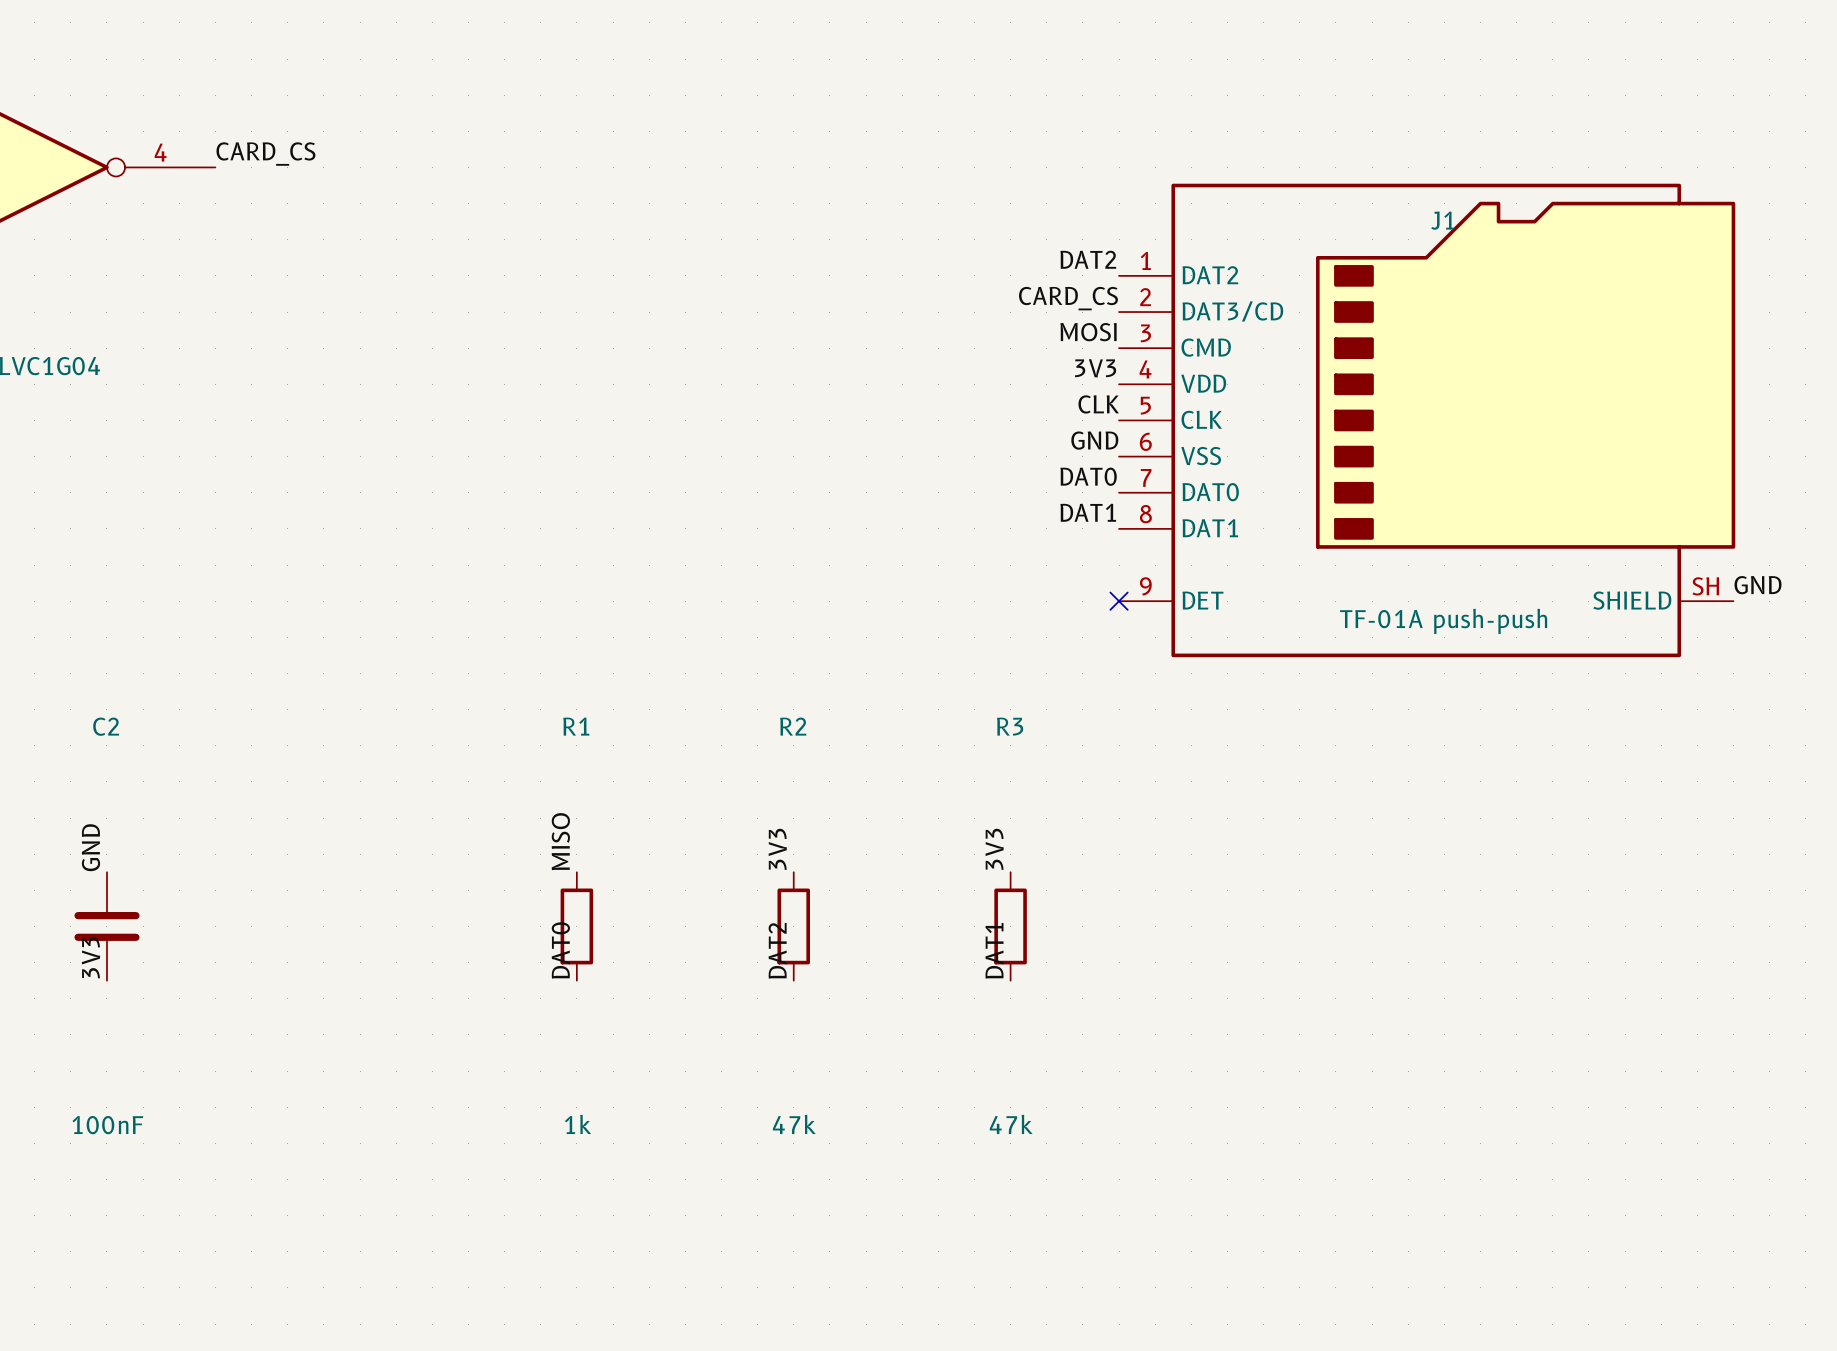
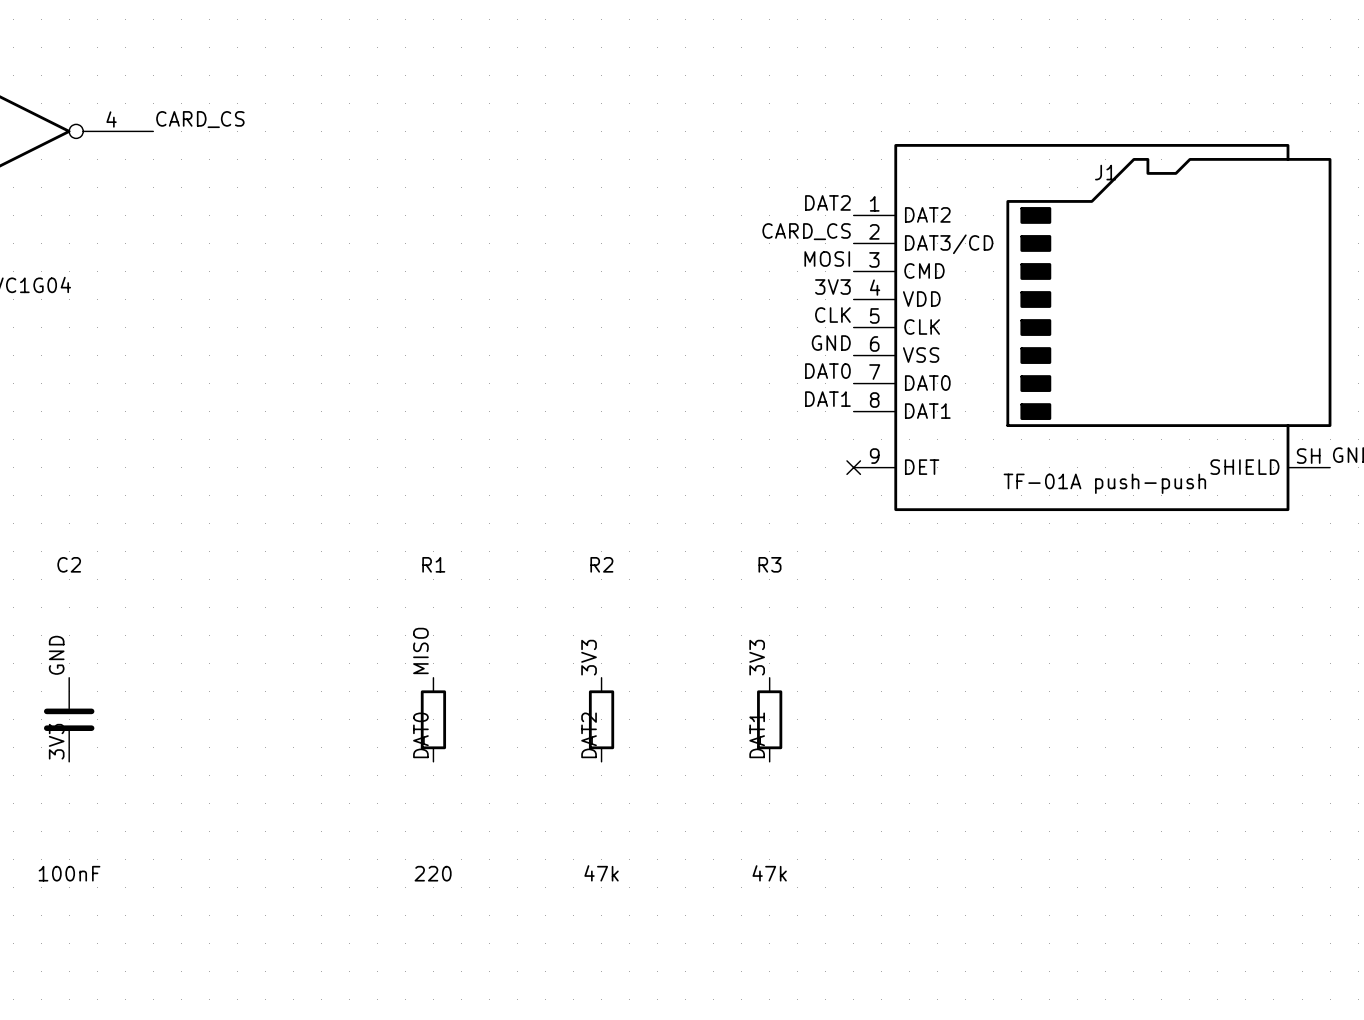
R1 value: 1k (578, 1124) -> 220 (433, 873)

